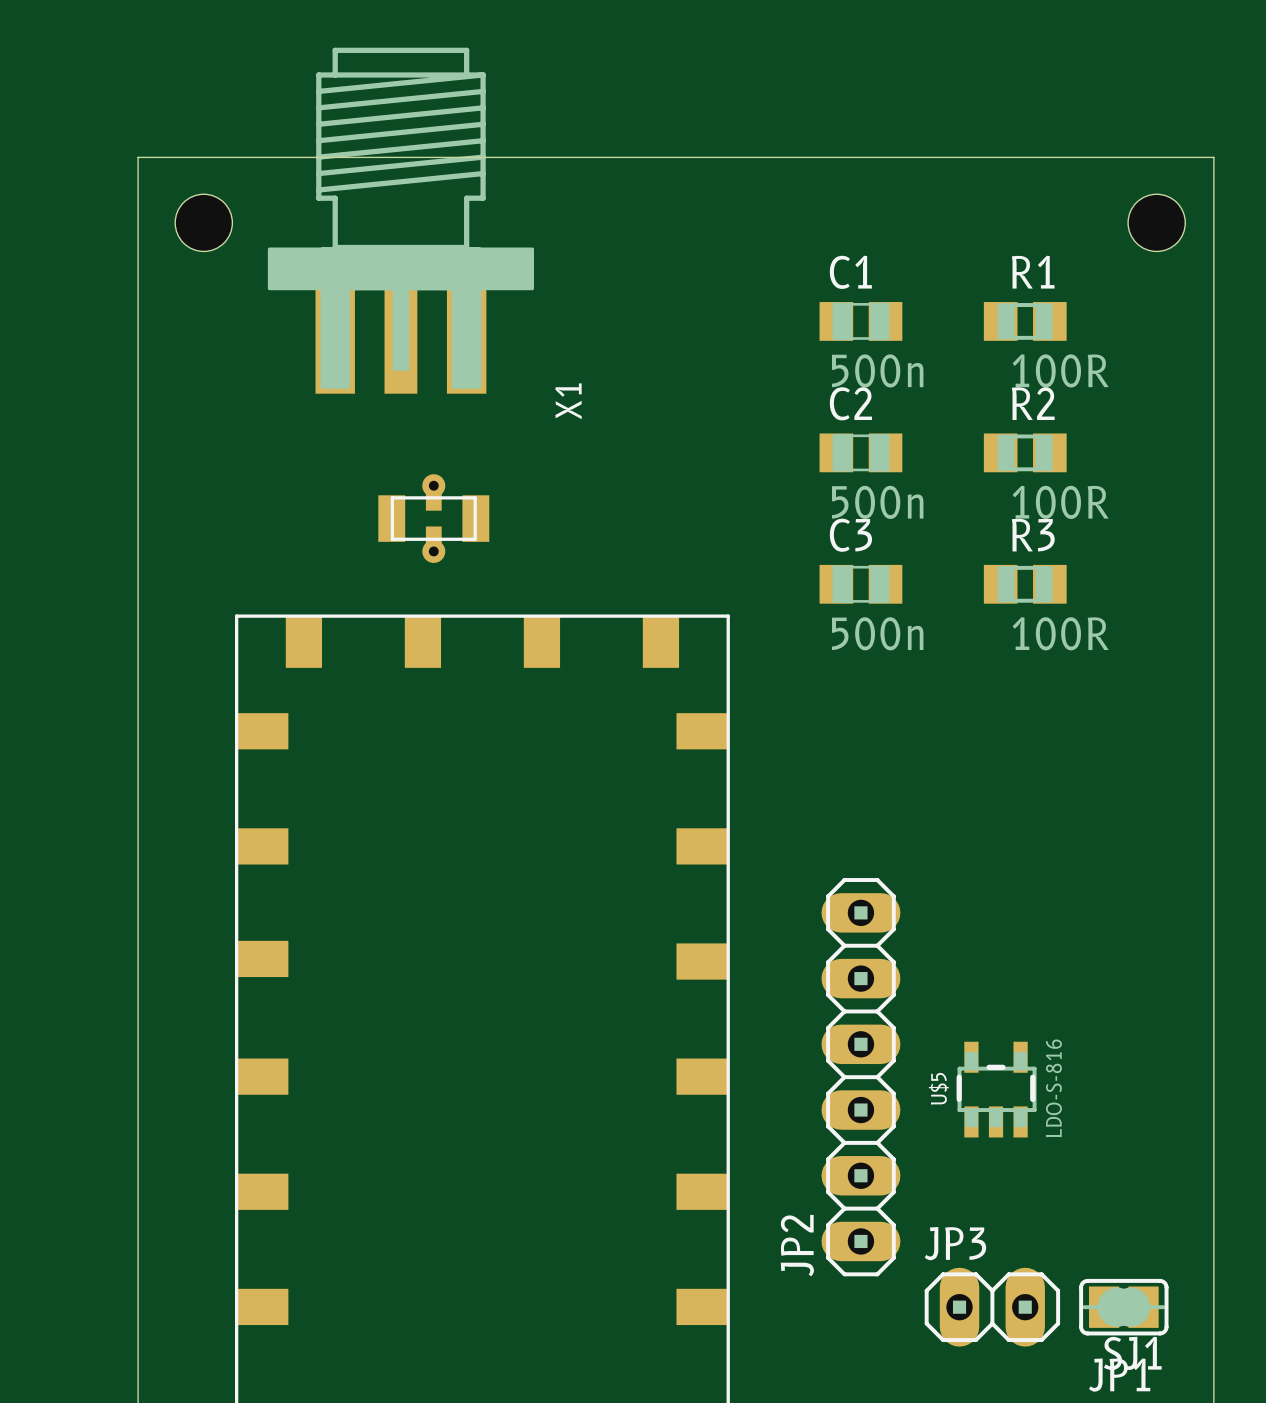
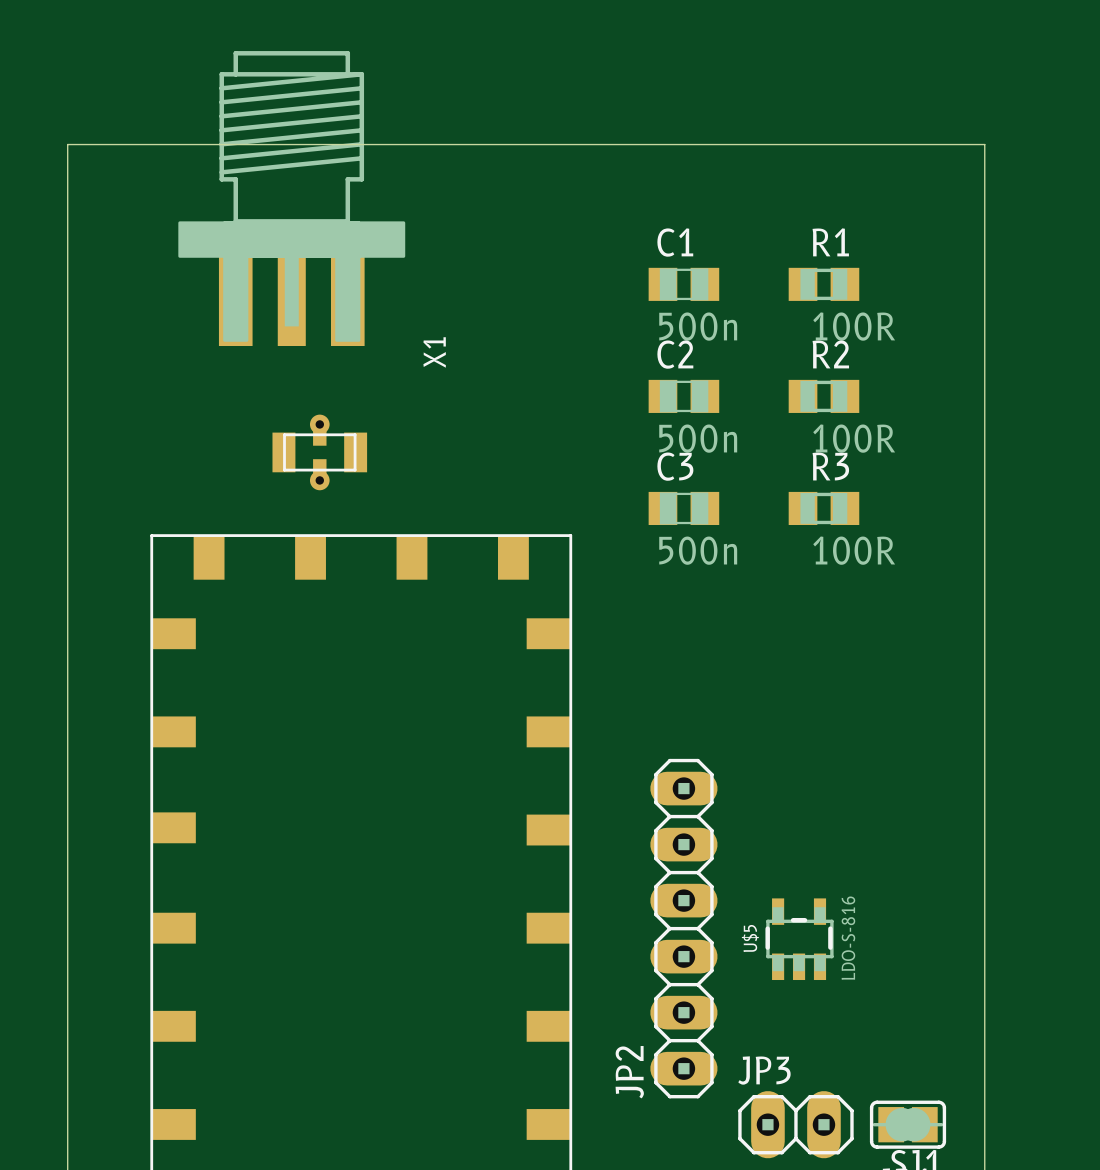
hole: (203, 222) -> none
hole: (1156, 222) -> none

